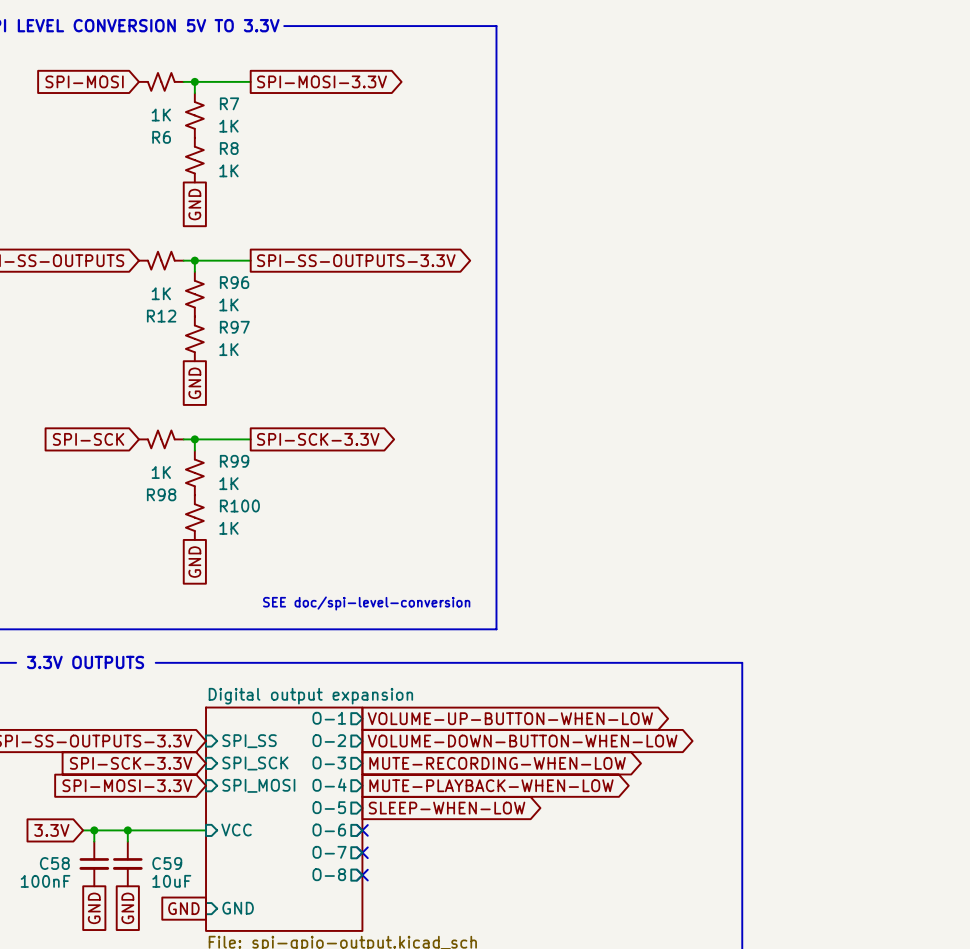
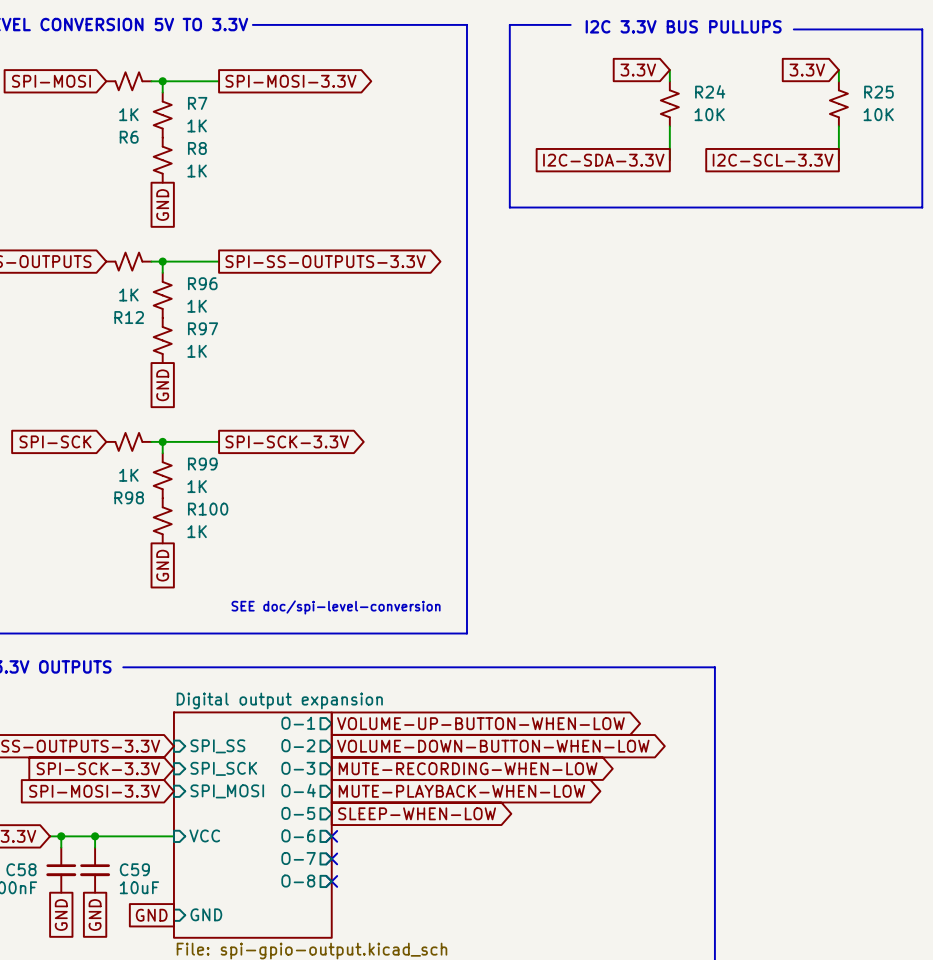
line: none -> (570, 24) (509, 24) (509, 207) (922, 207) (922, 29) (793, 29)
text: none -> I2C 3.3V BUS PULLUPS (683, 26)
global label: none -> 3.3V (638, 70)
wire: none -> (669, 70) (669, 81)
global label: none -> 3.3V (807, 70)
wire: none -> (838, 70) (838, 81)
R24: none -> 10K (669, 103)
R25: none -> 10K (838, 103)
wire: none -> (669, 126) (669, 160)
wire: none -> (838, 126) (838, 160)
global label: none -> I2C-SDA-3.3V (603, 160)
global label: none -> I2C-SCL-3.3V (773, 160)

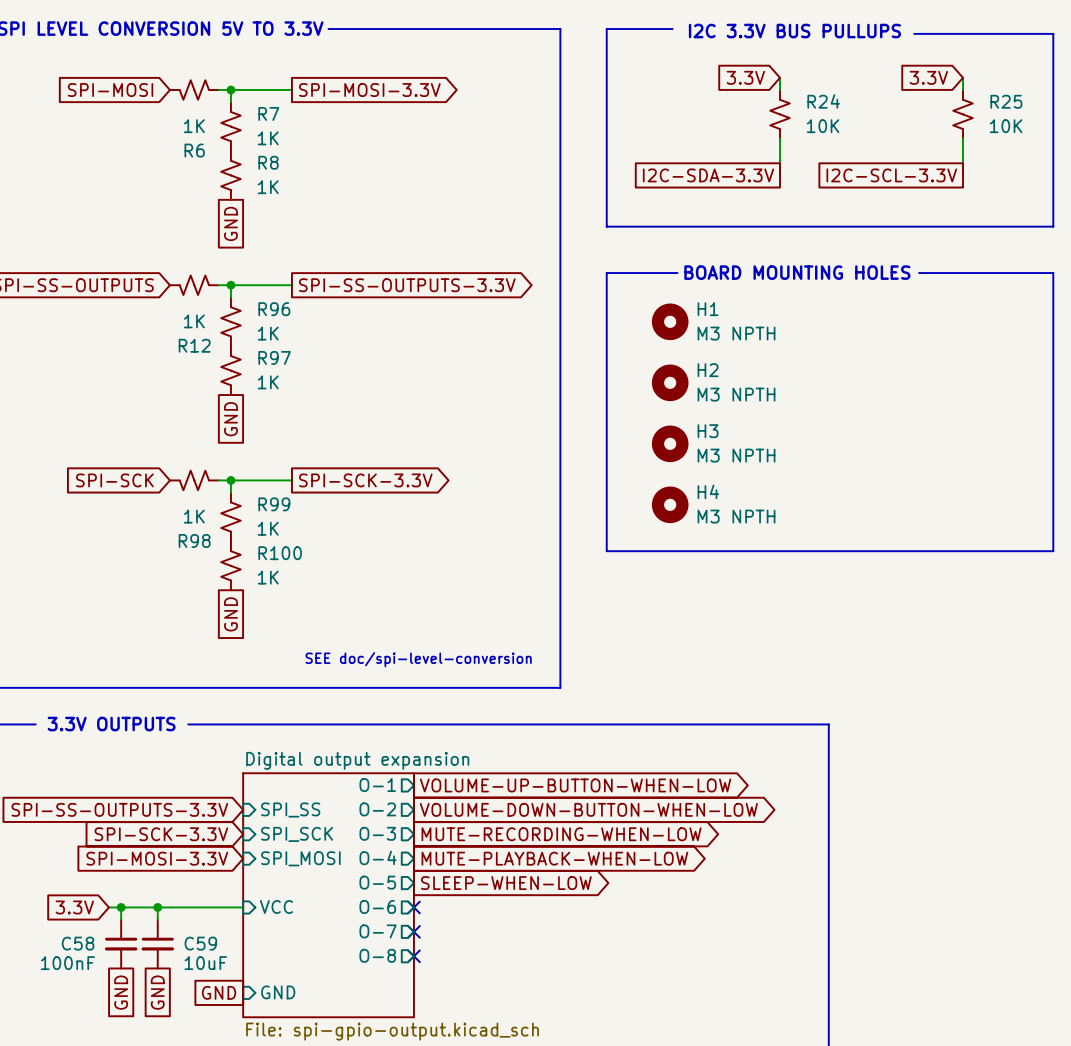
text: none -> BOARD MOUNTING HOLES (797, 272)
line: none -> (677, 273) (606, 273) (606, 551) (1053, 551) (1053, 273) (919, 273)
H1: none -> M3 NPTH (670, 321)
H2: none -> M3 NPTH (670, 382)
H3: none -> M3 NPTH (670, 443)
H4: none -> M3 NPTH (670, 504)

